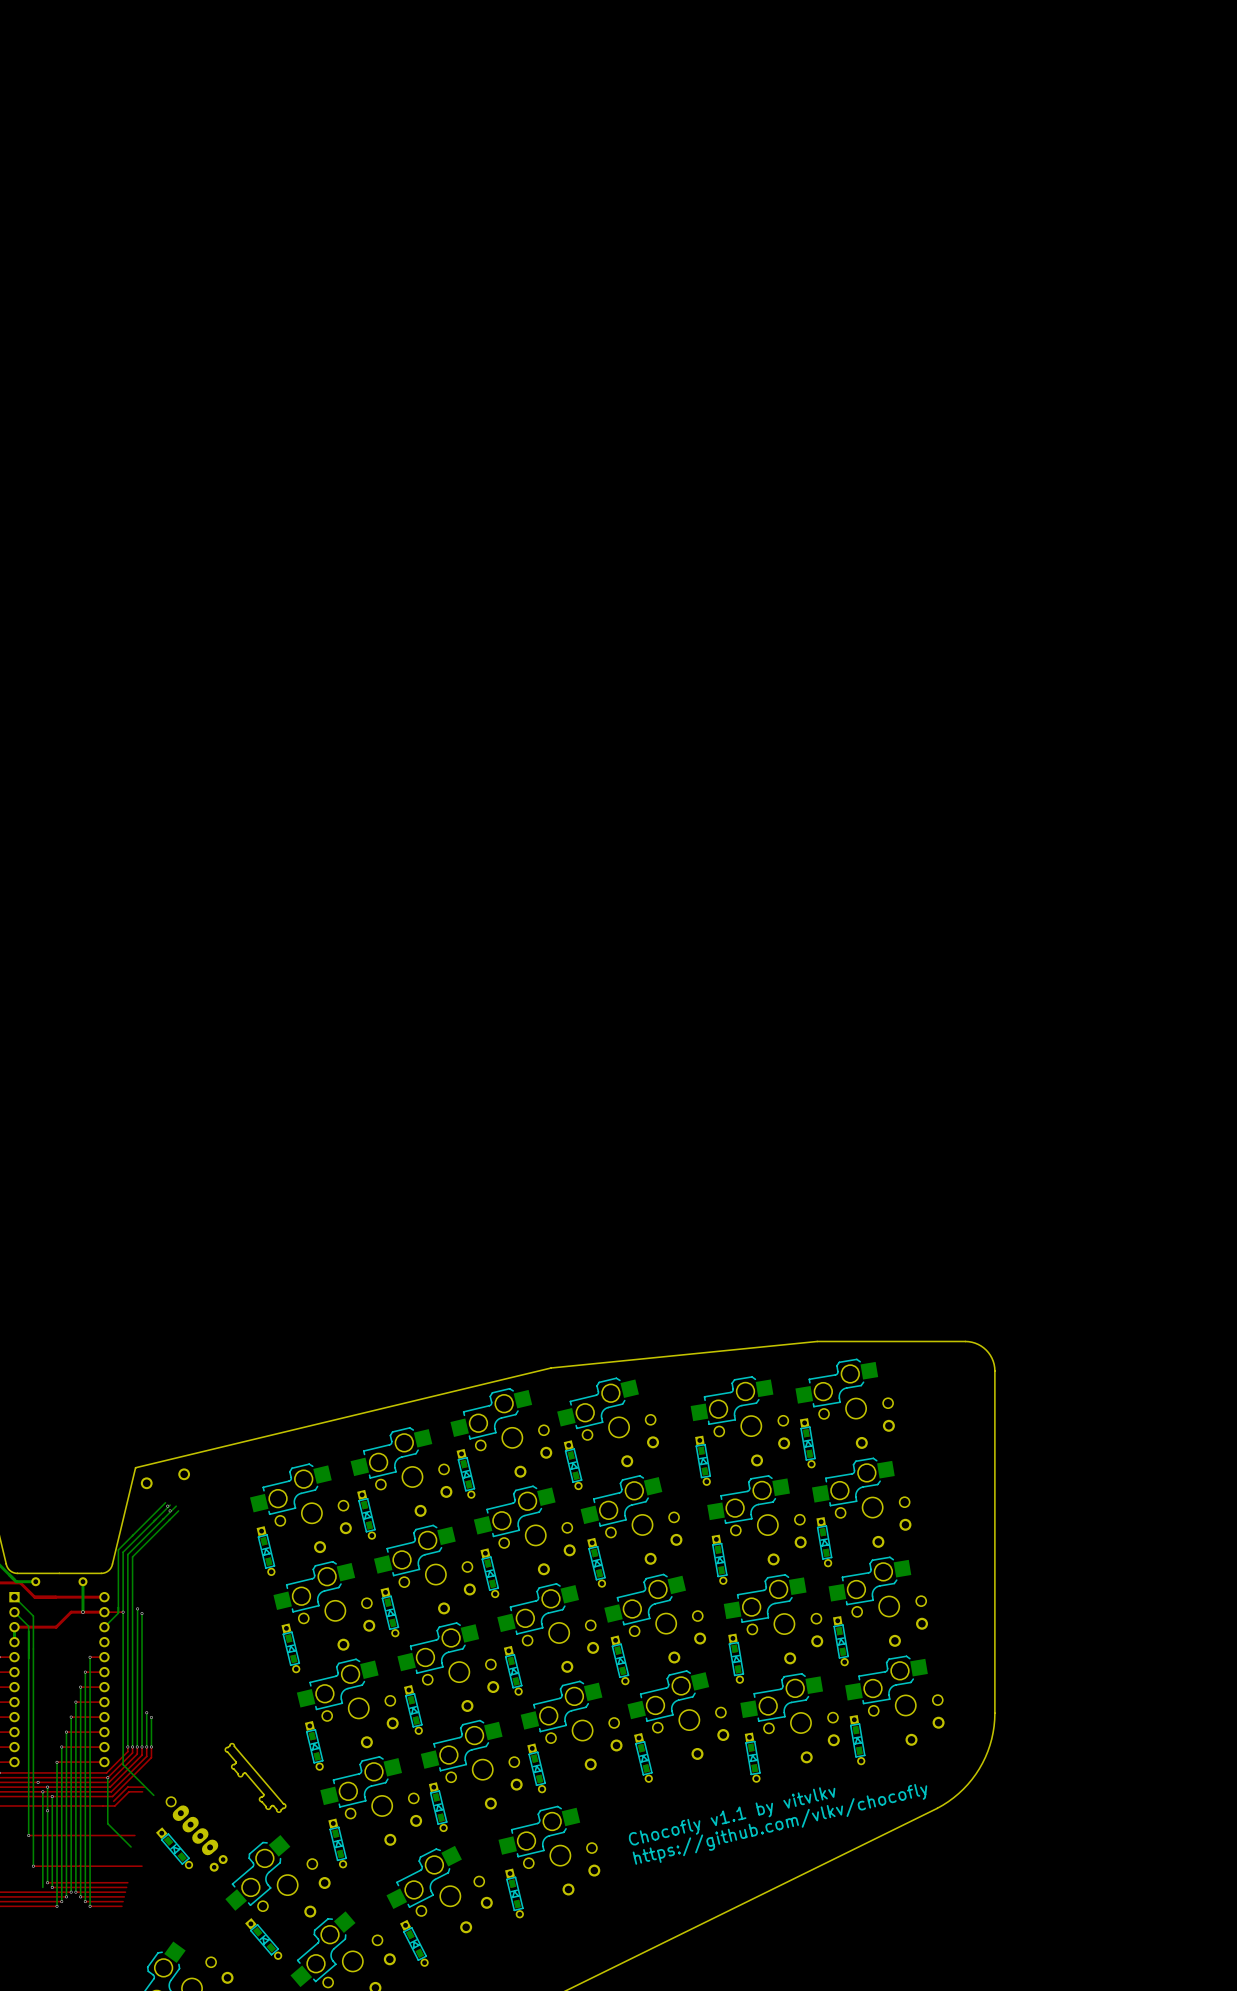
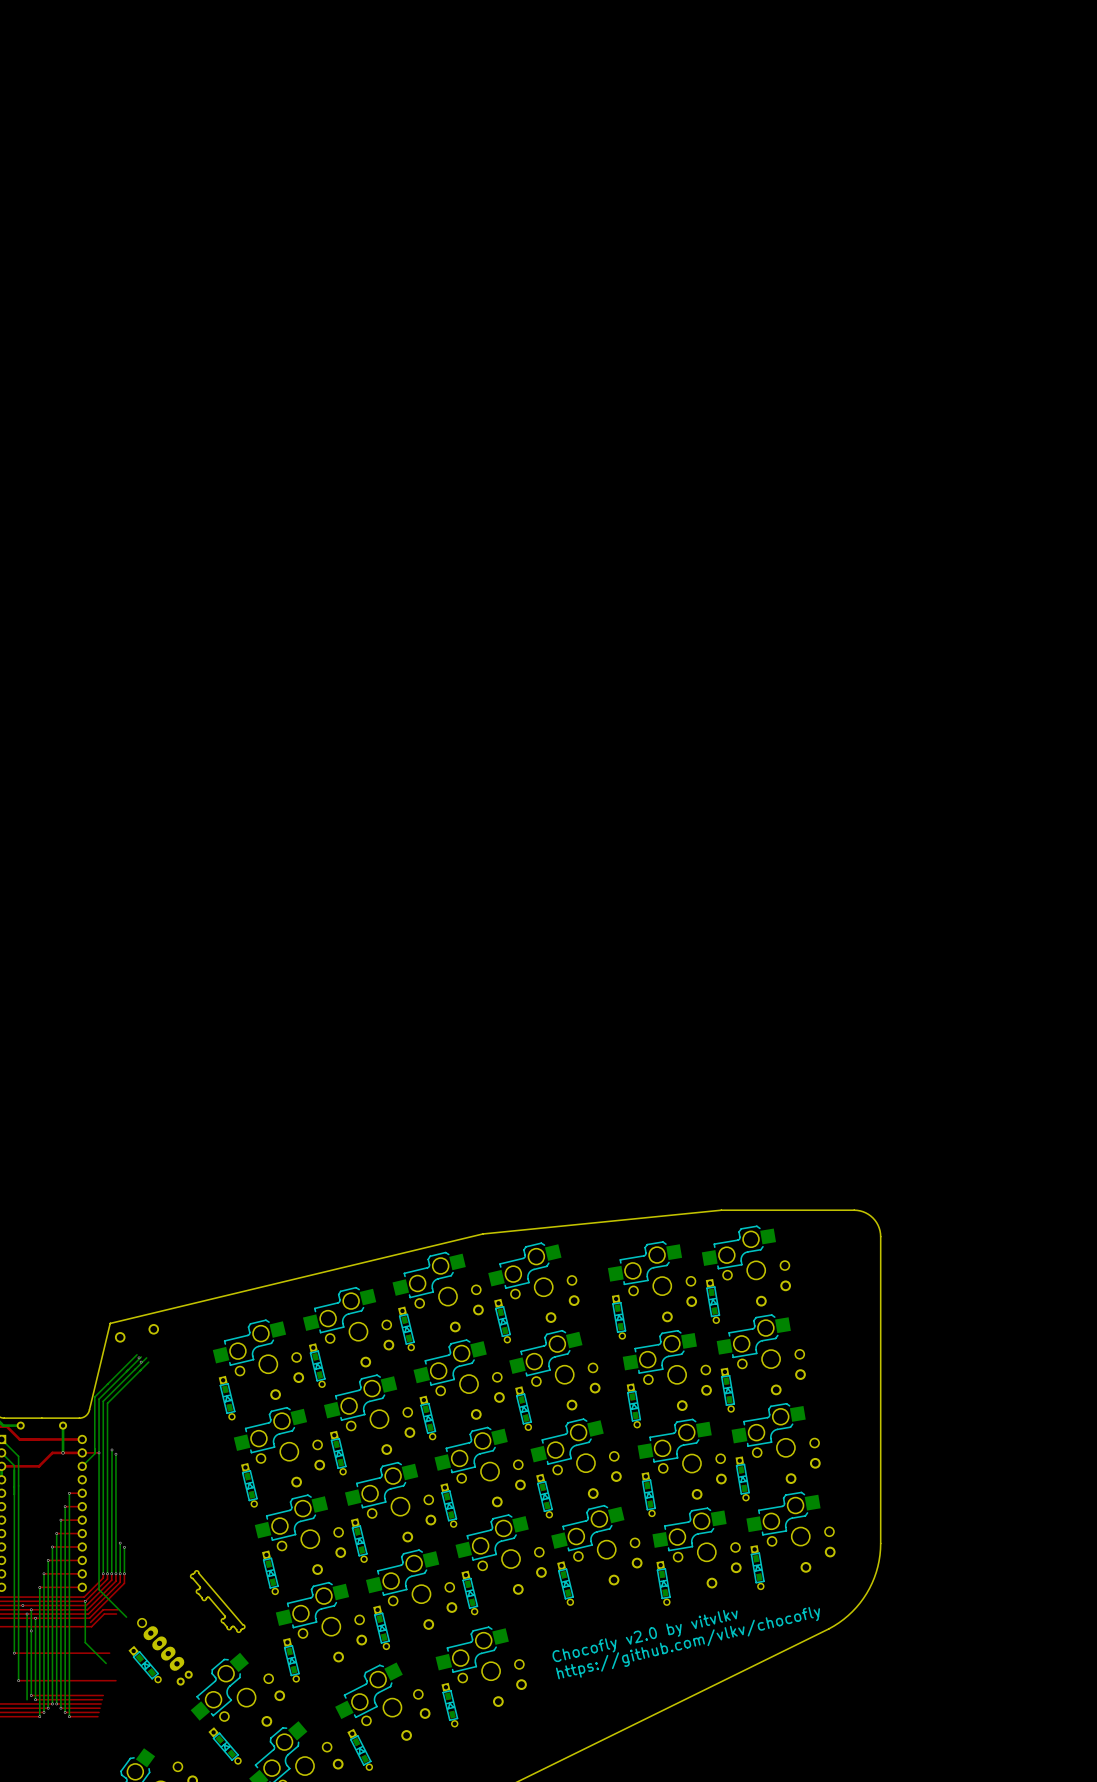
text: Chocofly v1.1 by vitvlkv (732, 1816) -> Chocofly v2.0 by vitvlkv (645, 1636)

